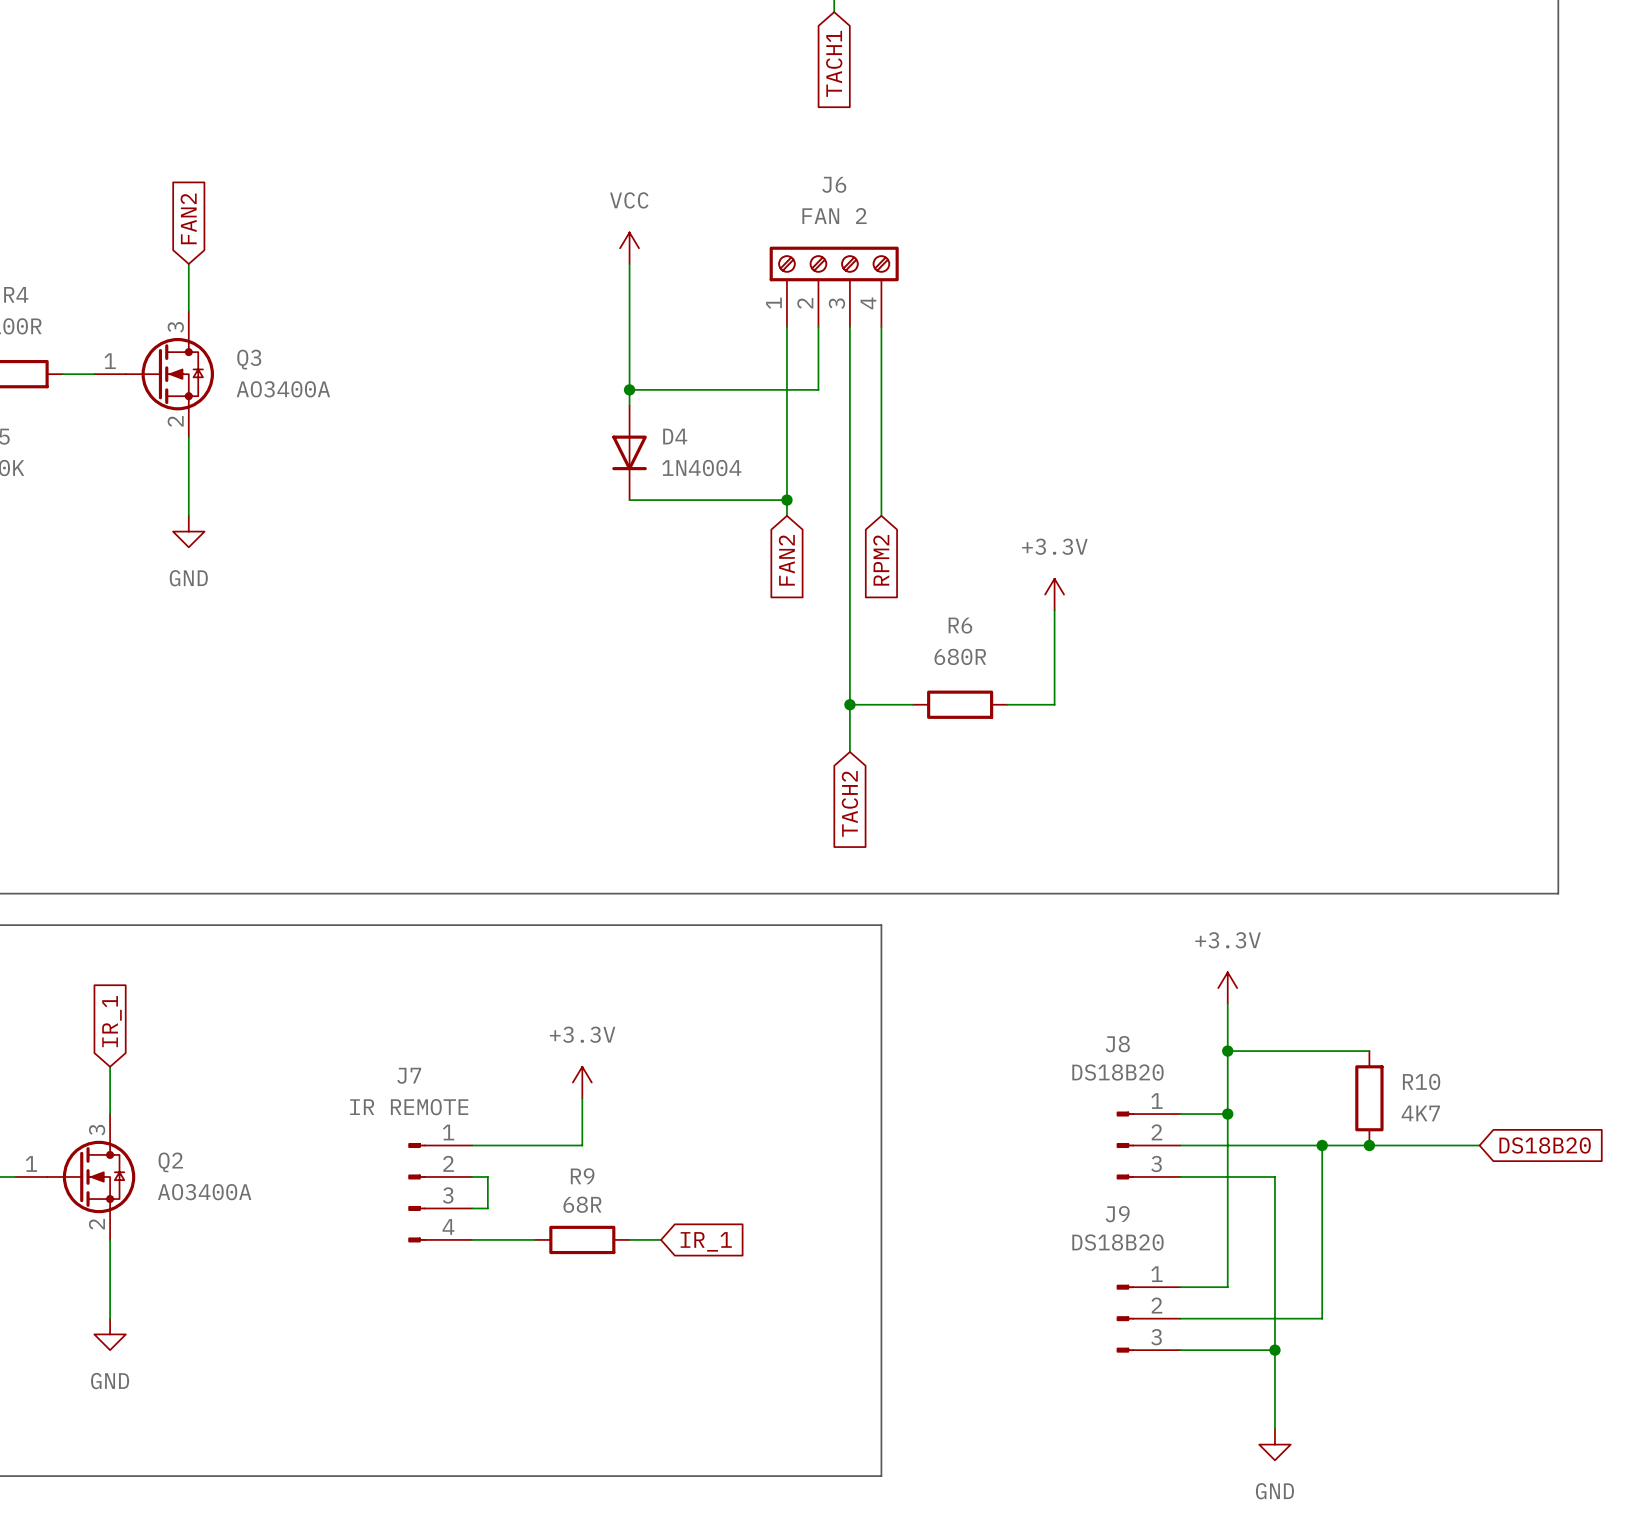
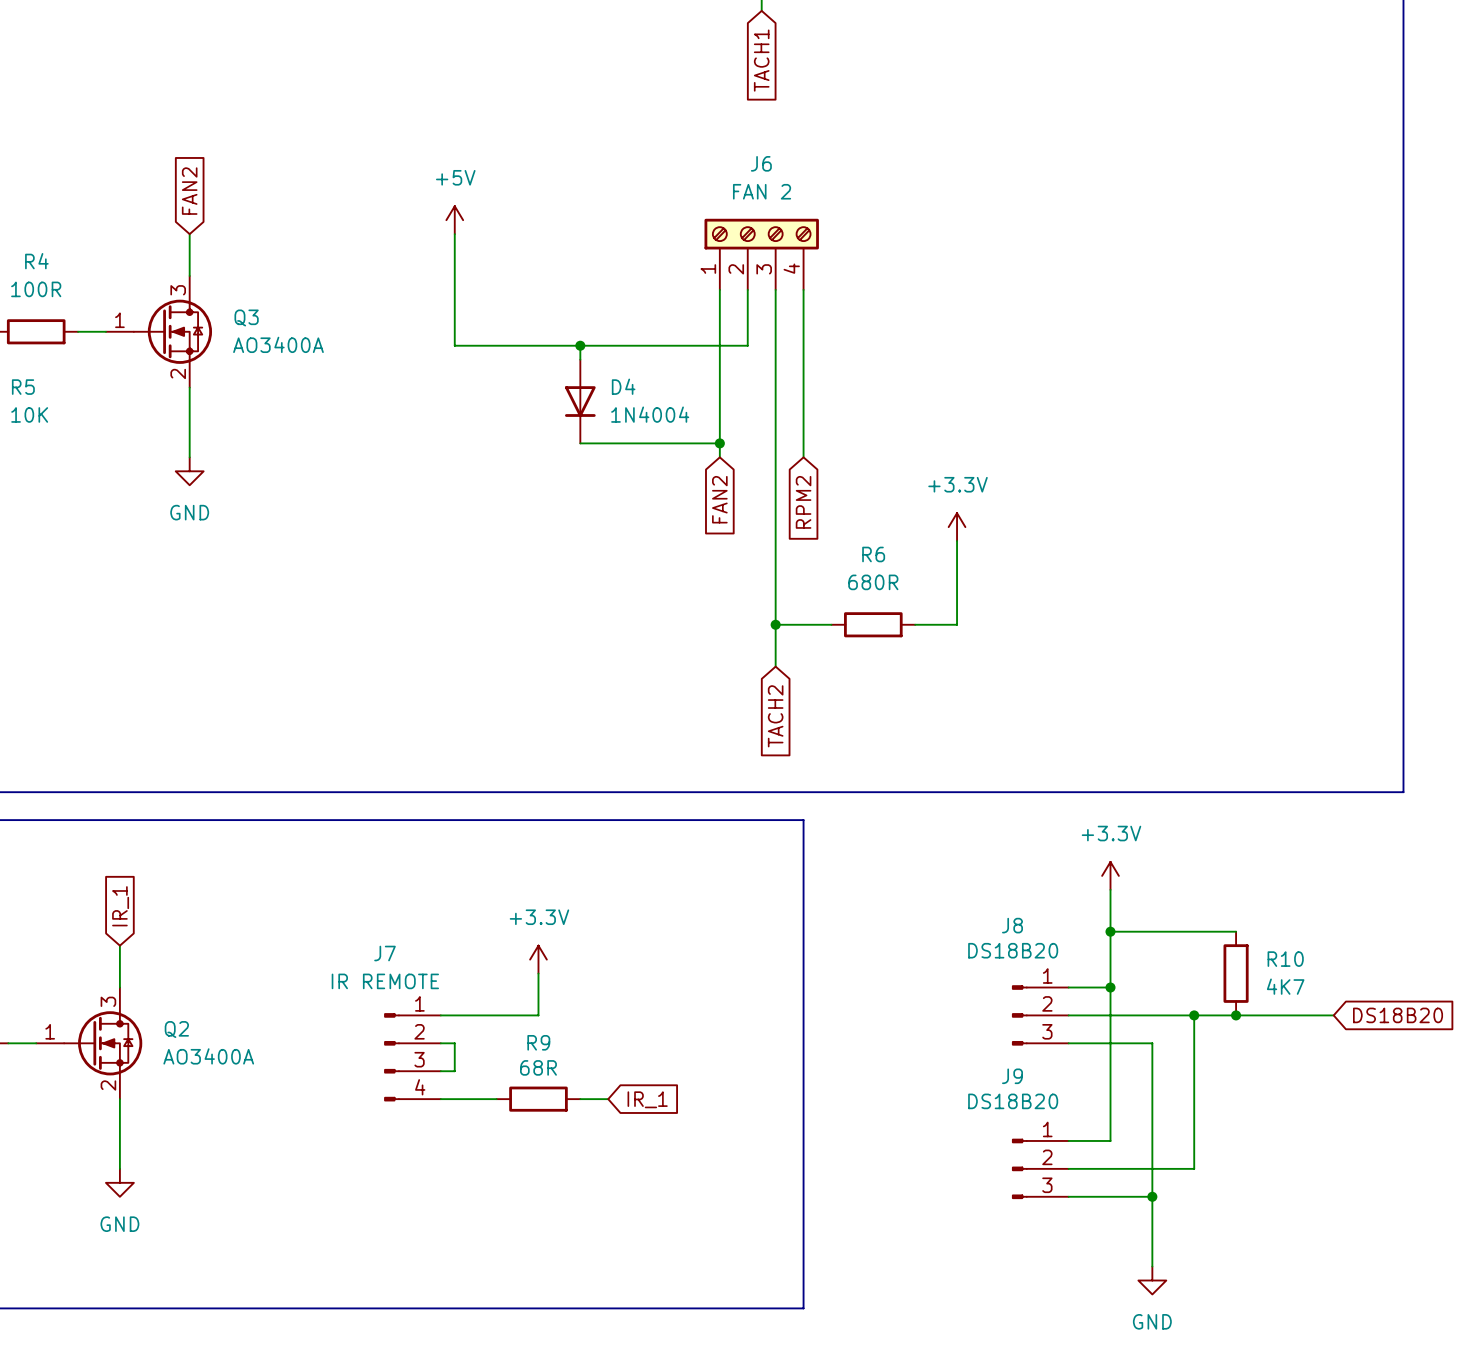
power symbol: none -> +5V (454, 220)
power symbol: VCC (629, 248) -> none
wire: (629, 263) (629, 389) -> (454, 234) (454, 345) (580, 345)

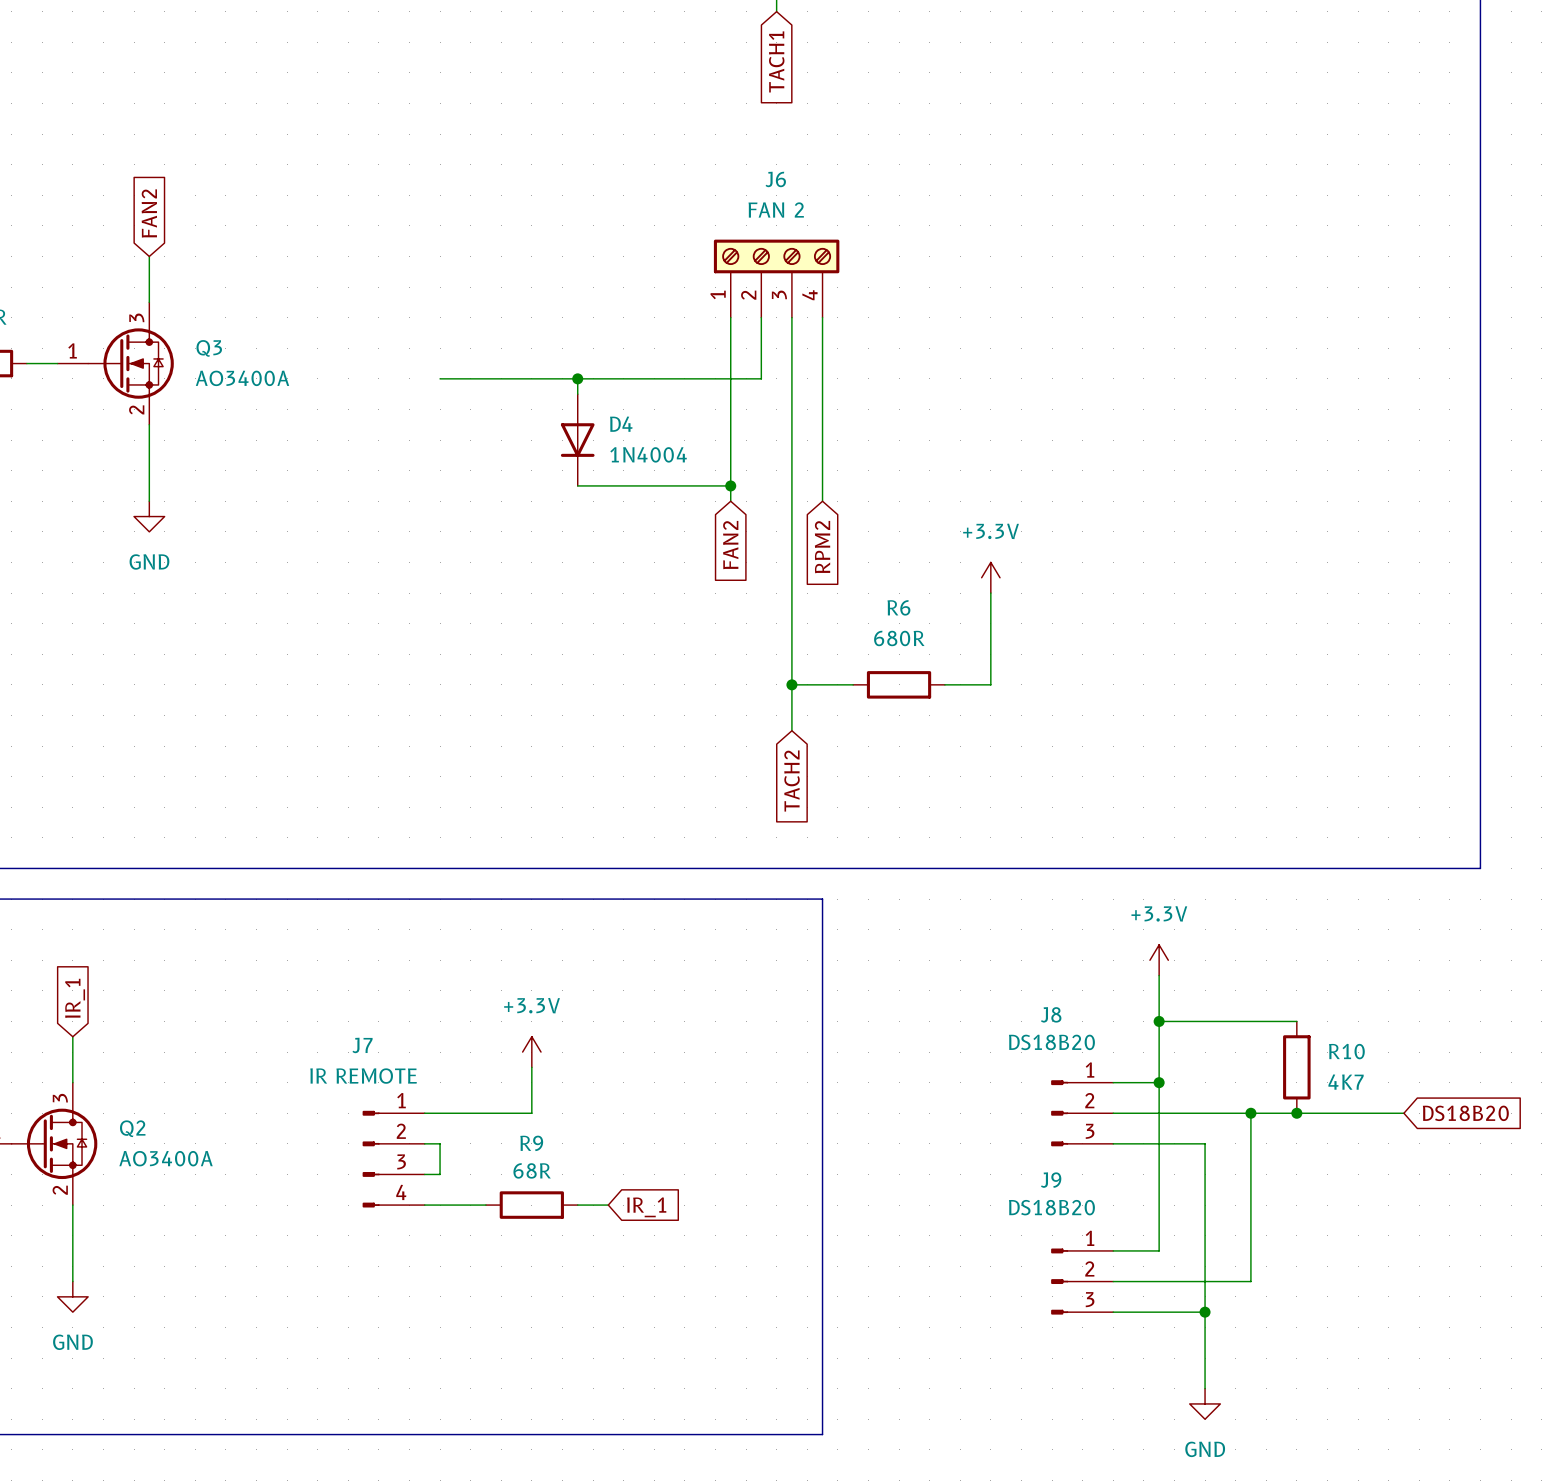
power symbol: +5V (454, 220) -> none
wire: (454, 234) (454, 345) -> none

